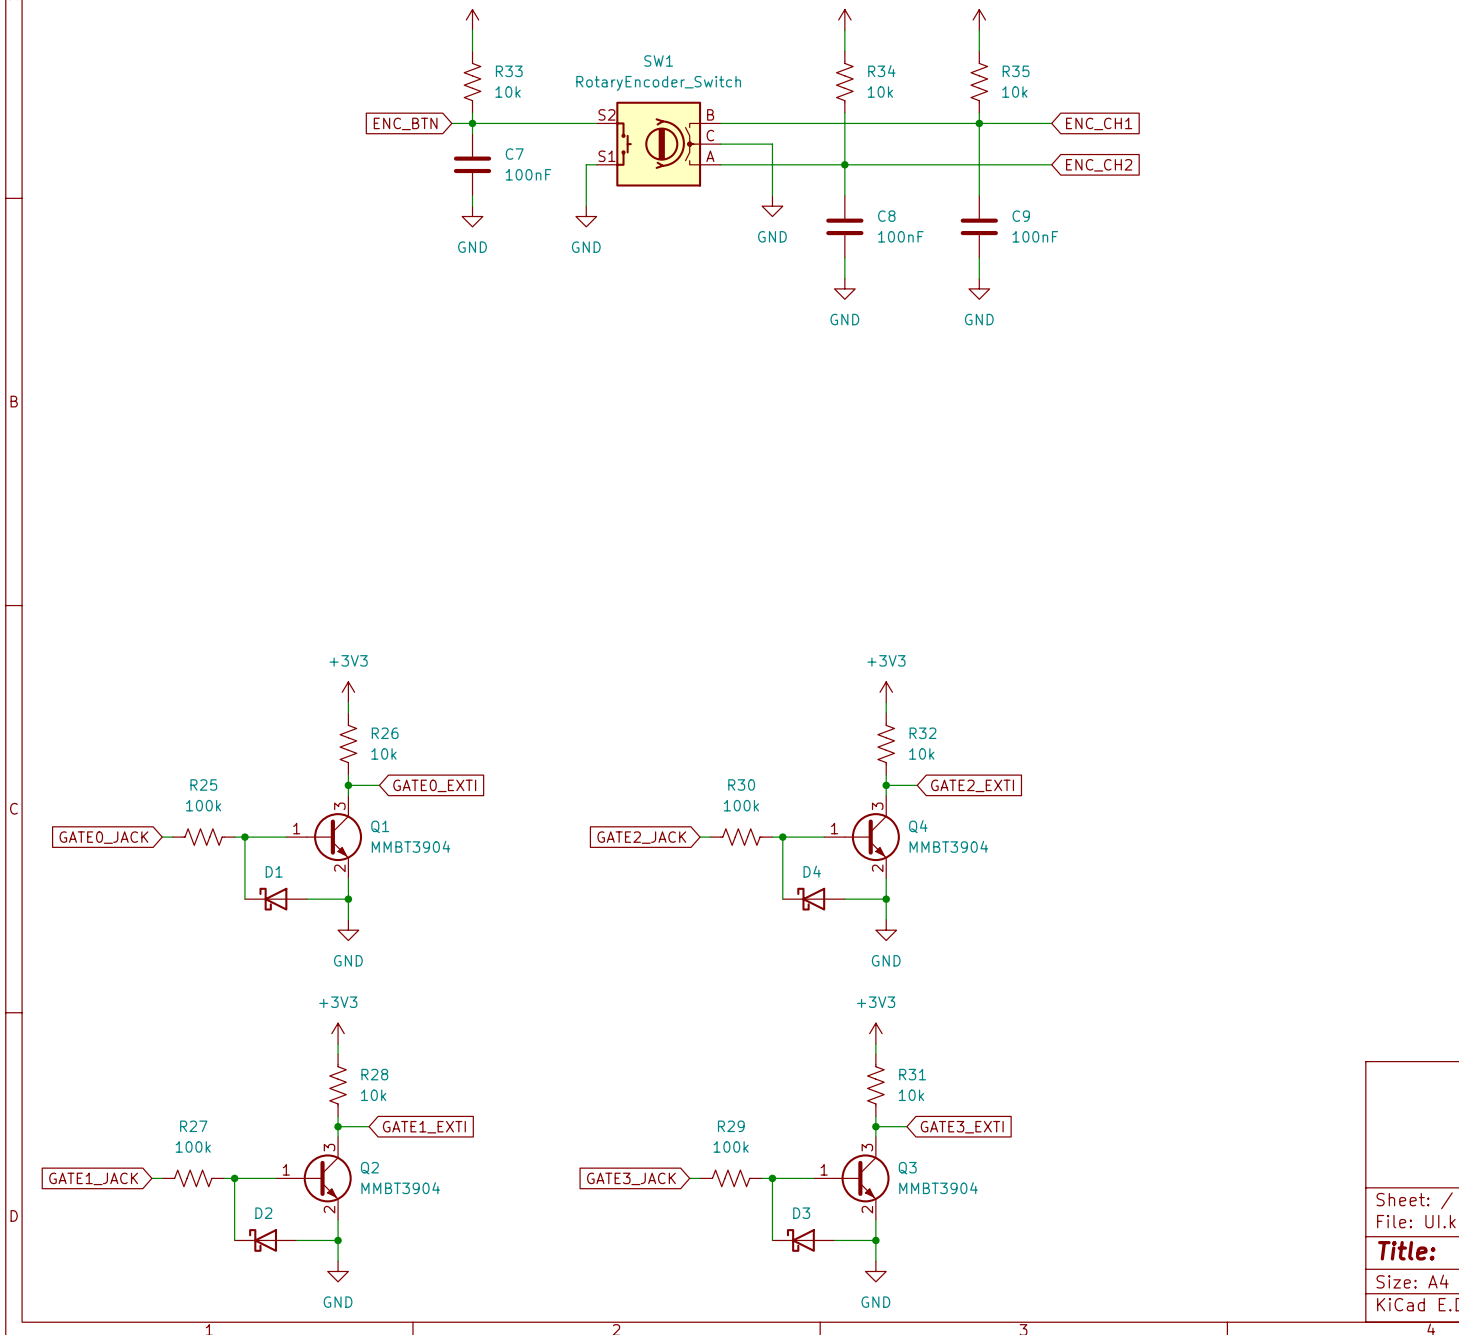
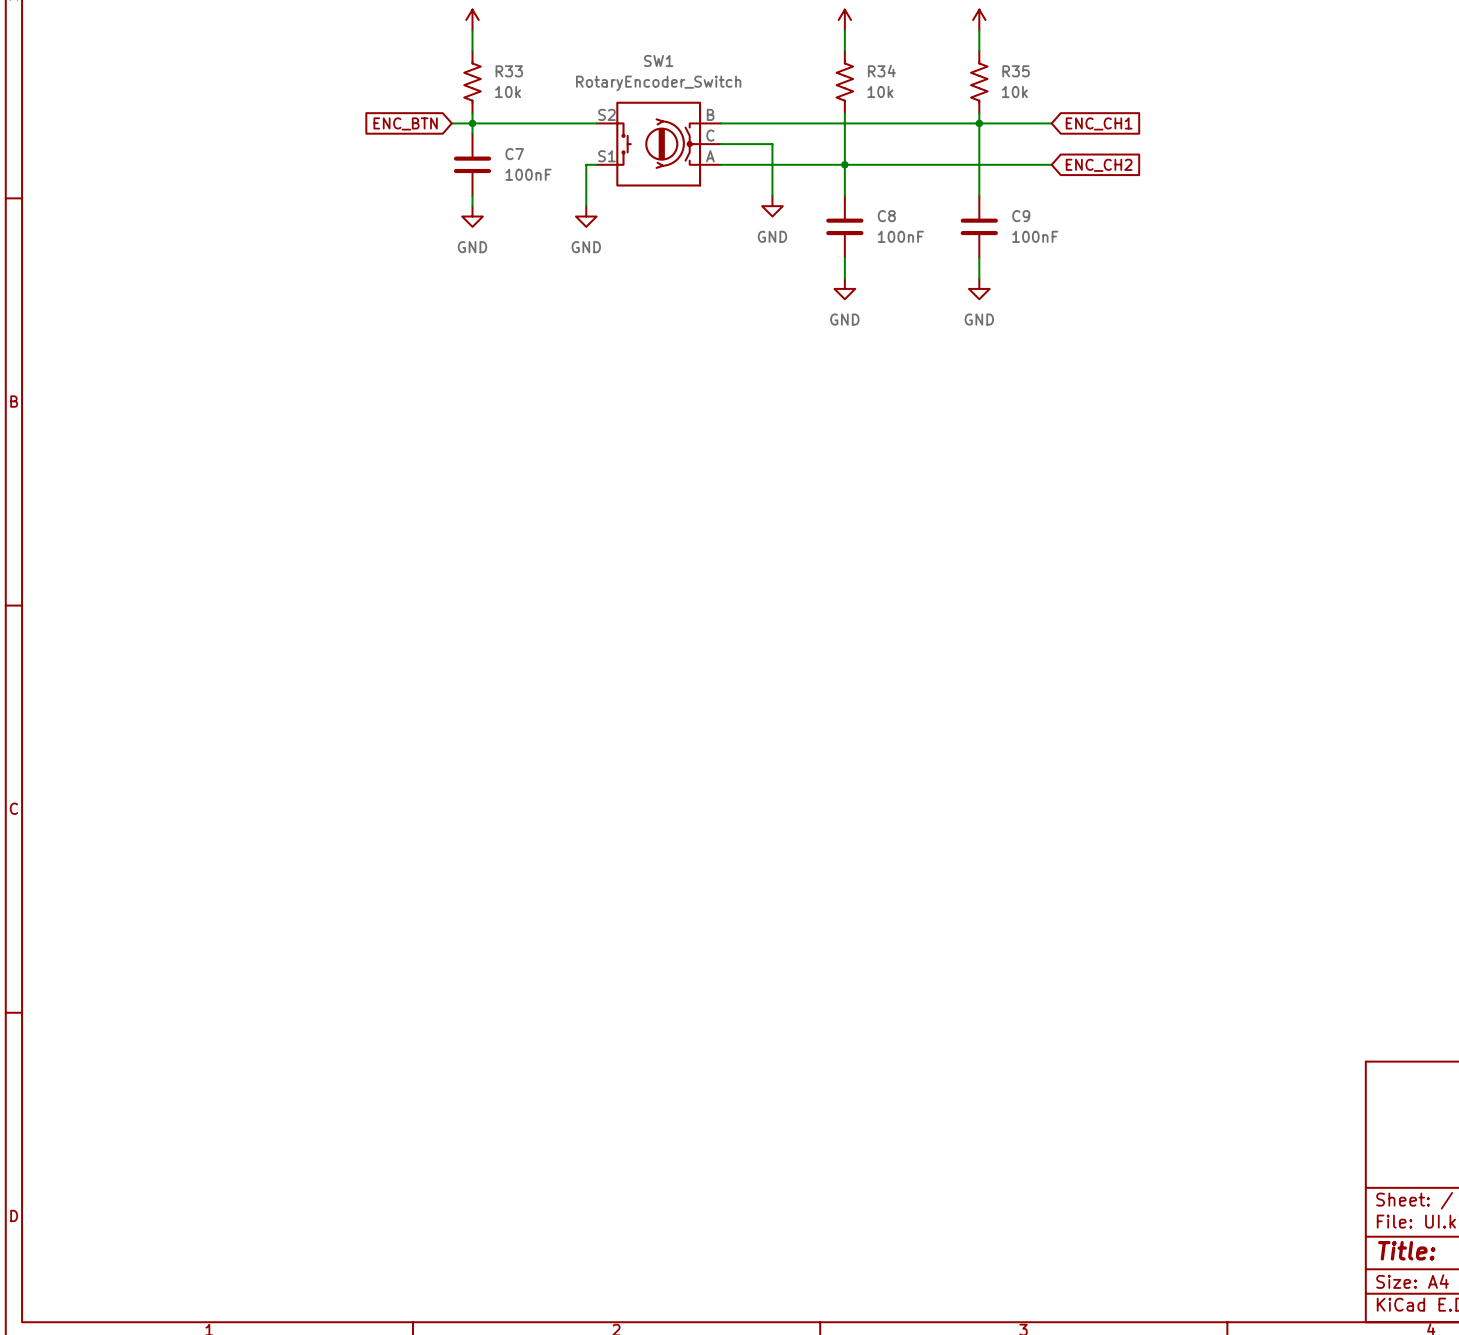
power symbol: +3V3 (348, 692) -> none
power symbol: +3V3 (886, 692) -> none
wire: (348, 702) (348, 712) -> none
wire: (886, 702) (886, 712) -> none
R26: 10k (348, 744) -> none
R32: 10k (886, 744) -> none
wire: (348, 775) (348, 795) -> none
wire: (886, 775) (886, 795) -> none
wire: (348, 785) (379, 785) -> none
junction: (348, 785) -> none
global label: GATE0_EXTI (434, 785) -> none
wire: (886, 785) (917, 785) -> none
junction: (886, 785) -> none
global label: GATE2_EXTI (972, 785) -> none
global label: GATE0_JACK (103, 837) -> none
wire: (162, 837) (172, 837) -> none
R25: 100k (203, 837) -> none
wire: (234, 837) (286, 837) -> none
wire: (244, 837) (244, 899) -> none
junction: (244, 837) -> none
Q1: MMBT3904 (324, 837) -> none
global label: GATE2_JACK (641, 837) -> none
wire: (700, 837) (710, 837) -> none
R30: 100k (741, 837) -> none
wire: (772, 837) (824, 837) -> none
wire: (782, 837) (782, 899) -> none
junction: (782, 837) -> none
Q4: MMBT3904 (862, 837) -> none
wire: (348, 878) (348, 919) -> none
wire: (886, 878) (886, 919) -> none
D1: (275, 899) -> none
wire: (307, 899) (348, 899) -> none
junction: (348, 899) -> none
D4: (813, 899) -> none
wire: (844, 899) (886, 899) -> none
junction: (886, 899) -> none
power symbol: GND (348, 930) -> none
power symbol: GND (886, 930) -> none
power symbol: +3V3 (338, 1033) -> none
power symbol: +3V3 (875, 1033) -> none
wire: (338, 1043) (338, 1054) -> none
wire: (875, 1043) (875, 1054) -> none
R28: 10k (338, 1085) -> none
R31: 10k (875, 1085) -> none
wire: (338, 1116) (338, 1137) -> none
wire: (875, 1116) (875, 1137) -> none
wire: (338, 1126) (369, 1126) -> none
junction: (338, 1126) -> none
wire: (875, 1126) (906, 1126) -> none
junction: (875, 1126) -> none
global label: GATE1_EXTI (424, 1127) -> none
global label: GATE3_EXTI (962, 1127) -> none
global label: GATE1_JACK (93, 1178) -> none
wire: (151, 1178) (162, 1178) -> none
R27: 100k (193, 1178) -> none
wire: (224, 1178) (275, 1178) -> none
wire: (234, 1178) (234, 1240) -> none
junction: (234, 1178) -> none
Q2: MMBT3904 (313, 1178) -> none
global label: GATE3_JACK (631, 1178) -> none
wire: (689, 1178) (700, 1178) -> none
R29: 100k (731, 1178) -> none
wire: (762, 1178) (813, 1178) -> none
wire: (772, 1178) (772, 1240) -> none
junction: (772, 1178) -> none
Q3: MMBT3904 (851, 1178) -> none
wire: (338, 1219) (338, 1261) -> none
wire: (875, 1219) (875, 1261) -> none
D2: (265, 1240) -> none
wire: (296, 1240) (338, 1240) -> none
junction: (338, 1240) -> none
D3: (803, 1240) -> none
wire: (834, 1240) (875, 1240) -> none
junction: (875, 1240) -> none
power symbol: GND (338, 1271) -> none
power symbol: GND (875, 1271) -> none

